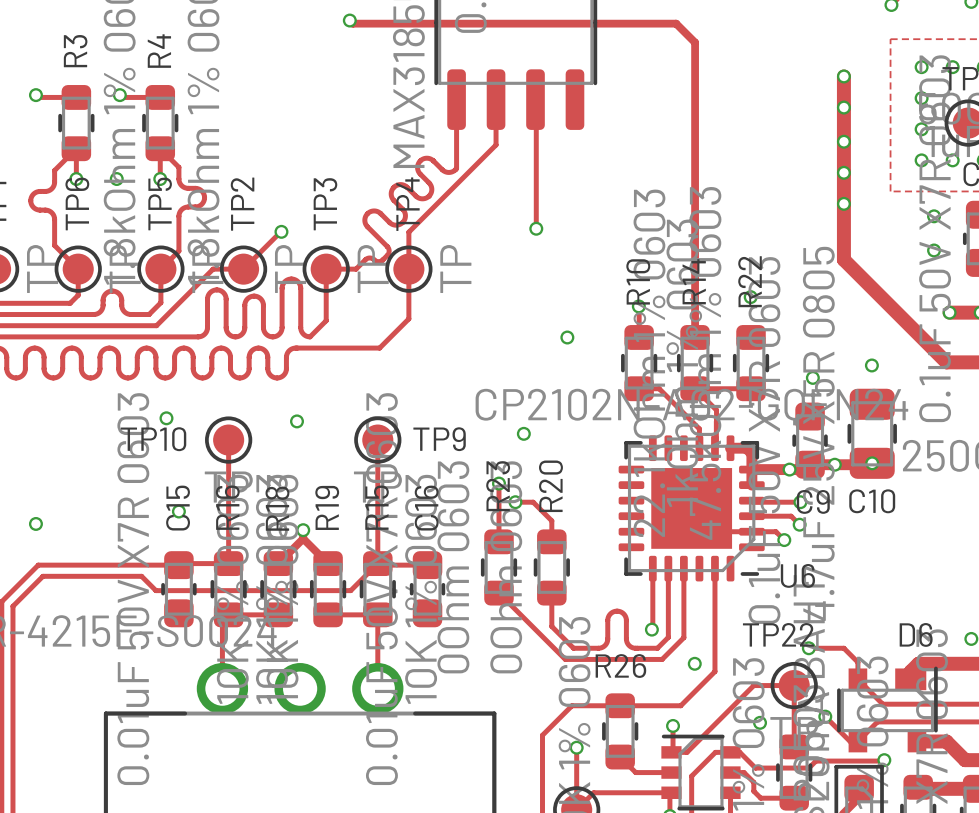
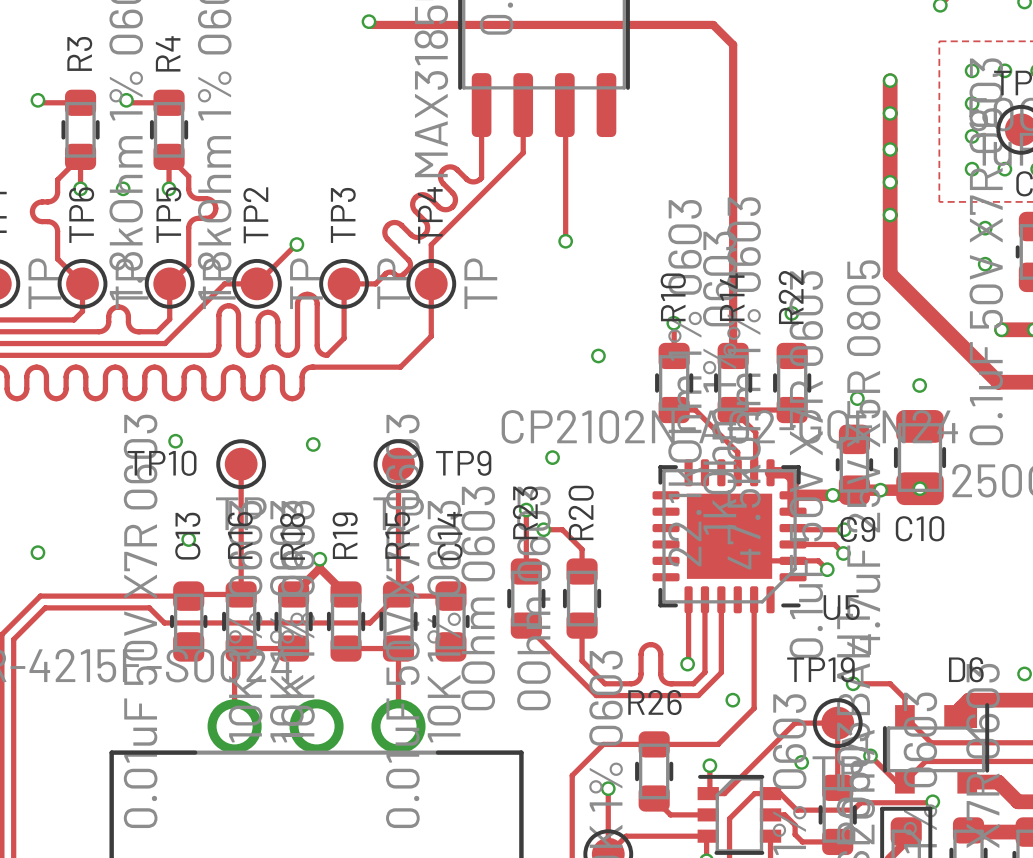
C15 name: C15 (178, 508) -> C13 (187, 536)
C16 name: C16 (426, 508) -> C14 (450, 536)
U6 name: U6 (797, 575) -> U5 (841, 607)
TP22 name: TP22 (778, 634) -> TP19 (820, 669)

